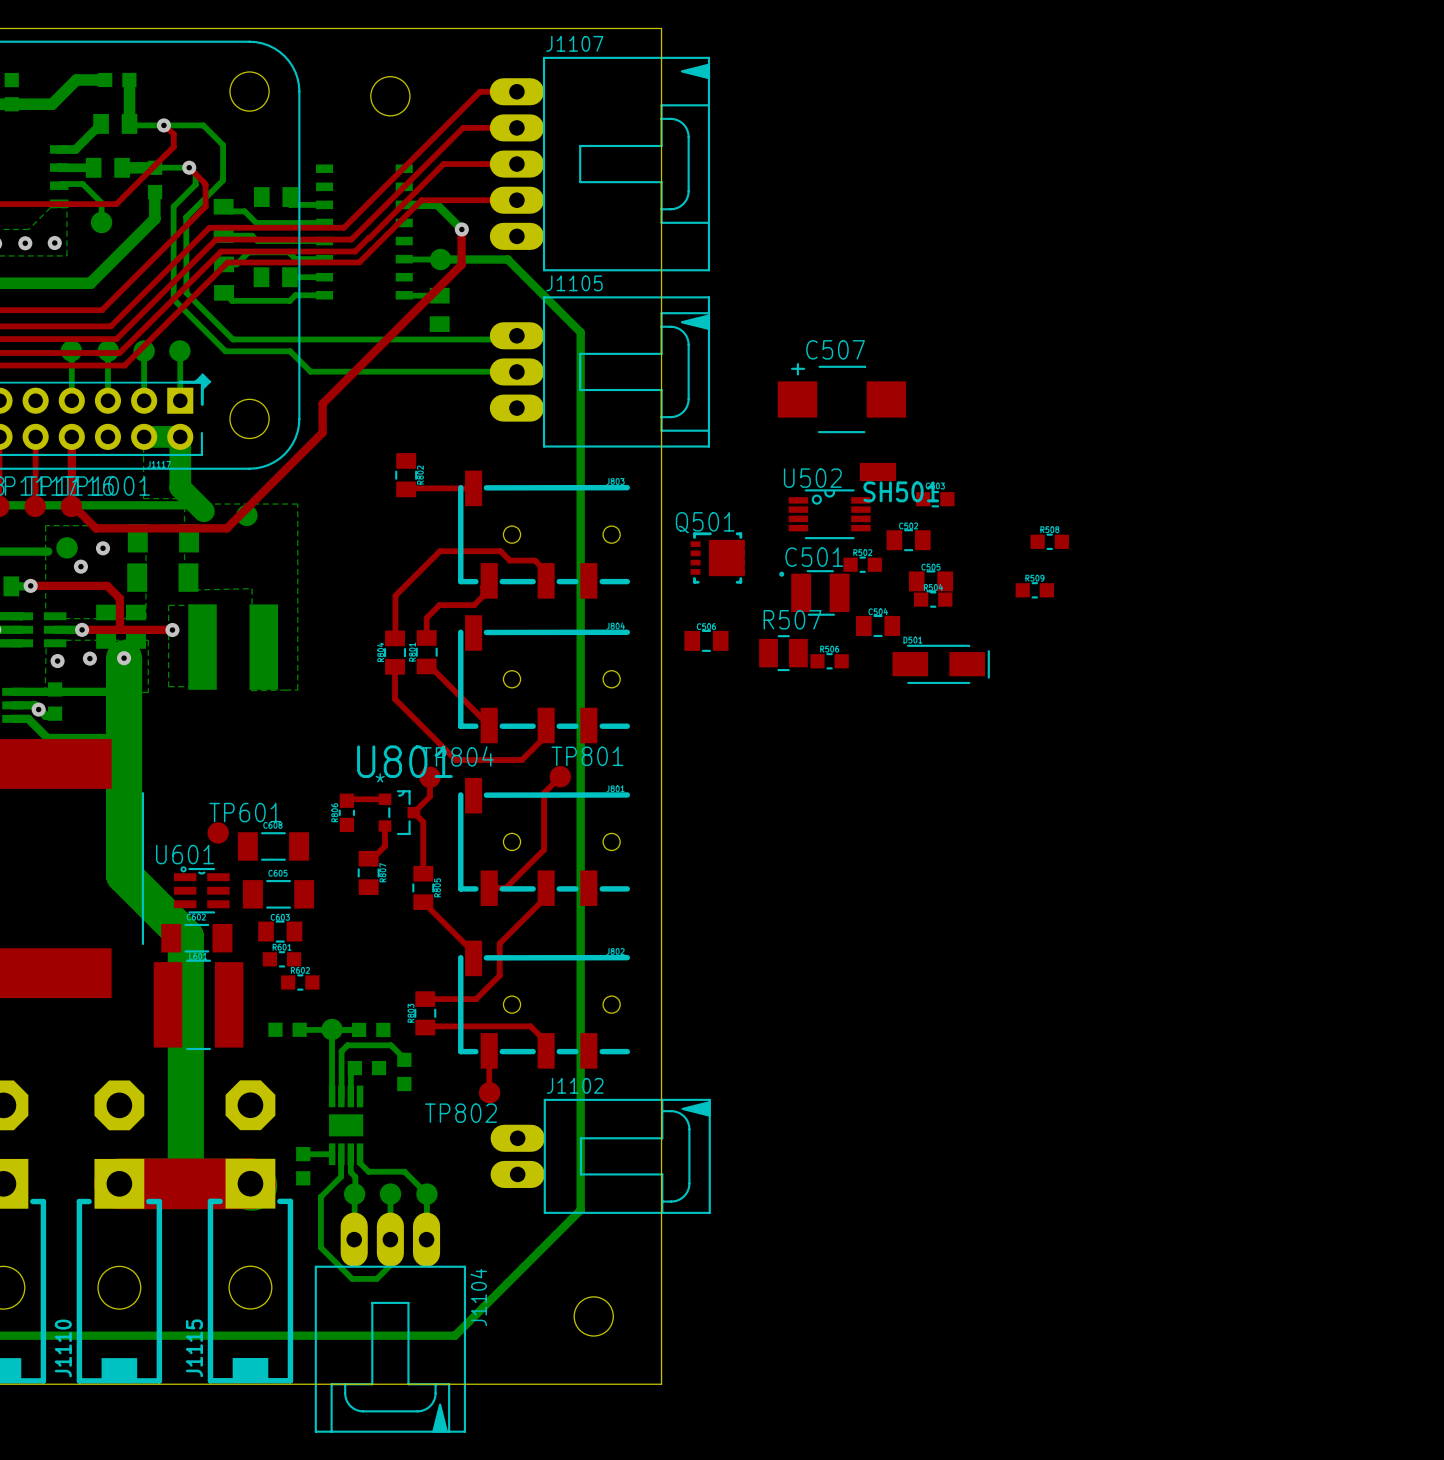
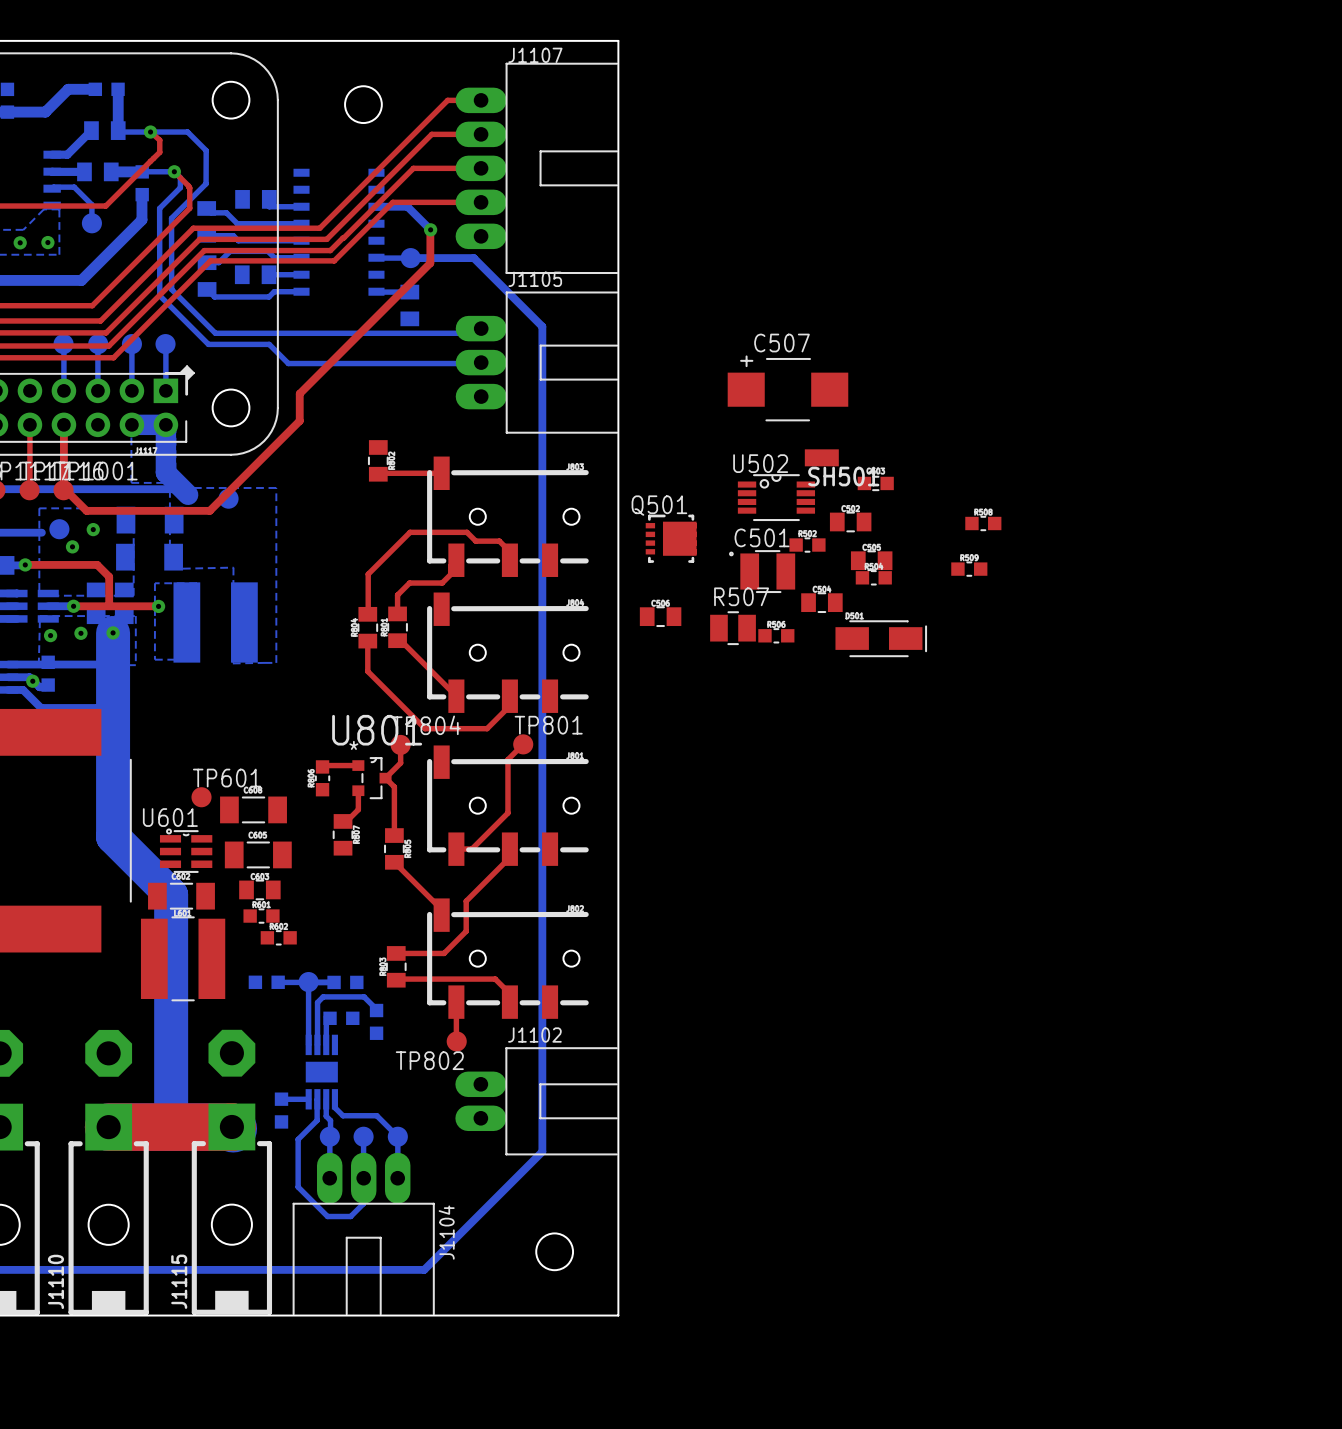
J1107 footprint: [489, 56, 711, 272] -> [455, 62, 619, 275]
J1105 footprint: [489, 296, 711, 448] -> [455, 291, 619, 434]
J1102 footprint: [490, 1098, 711, 1214] -> [455, 1047, 618, 1156]
J1104 footprint: [314, 1212, 467, 1433] -> [292, 1152, 435, 1316]

